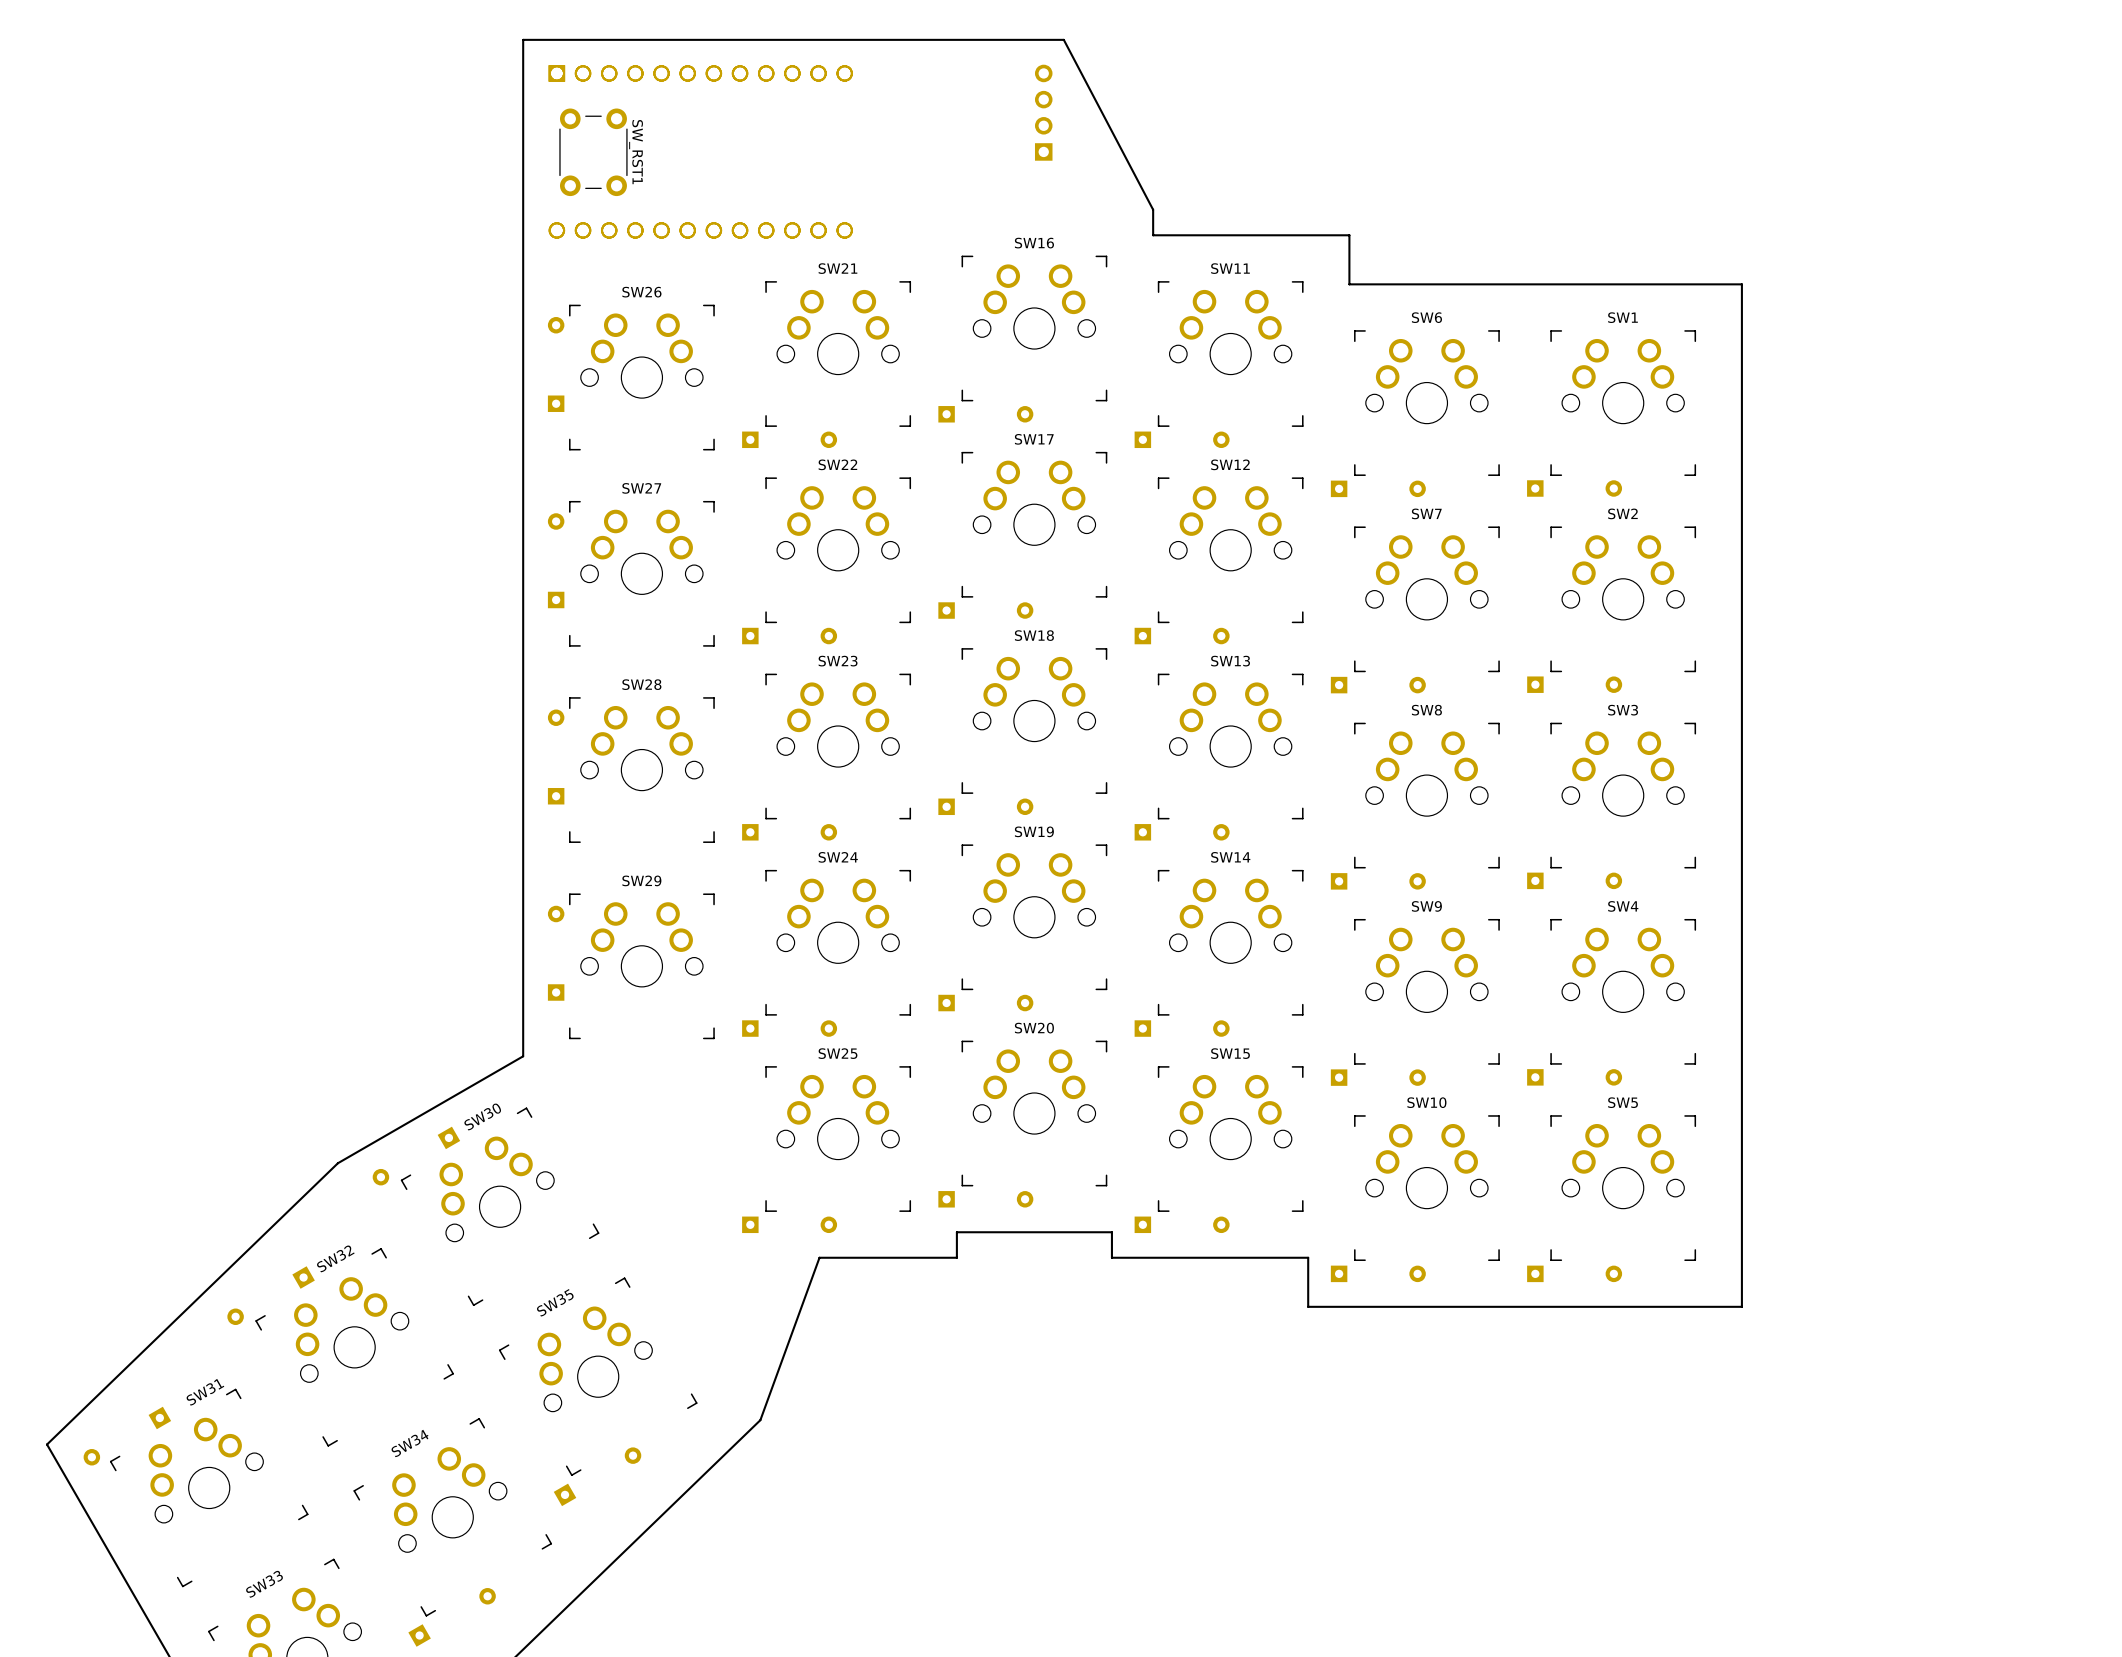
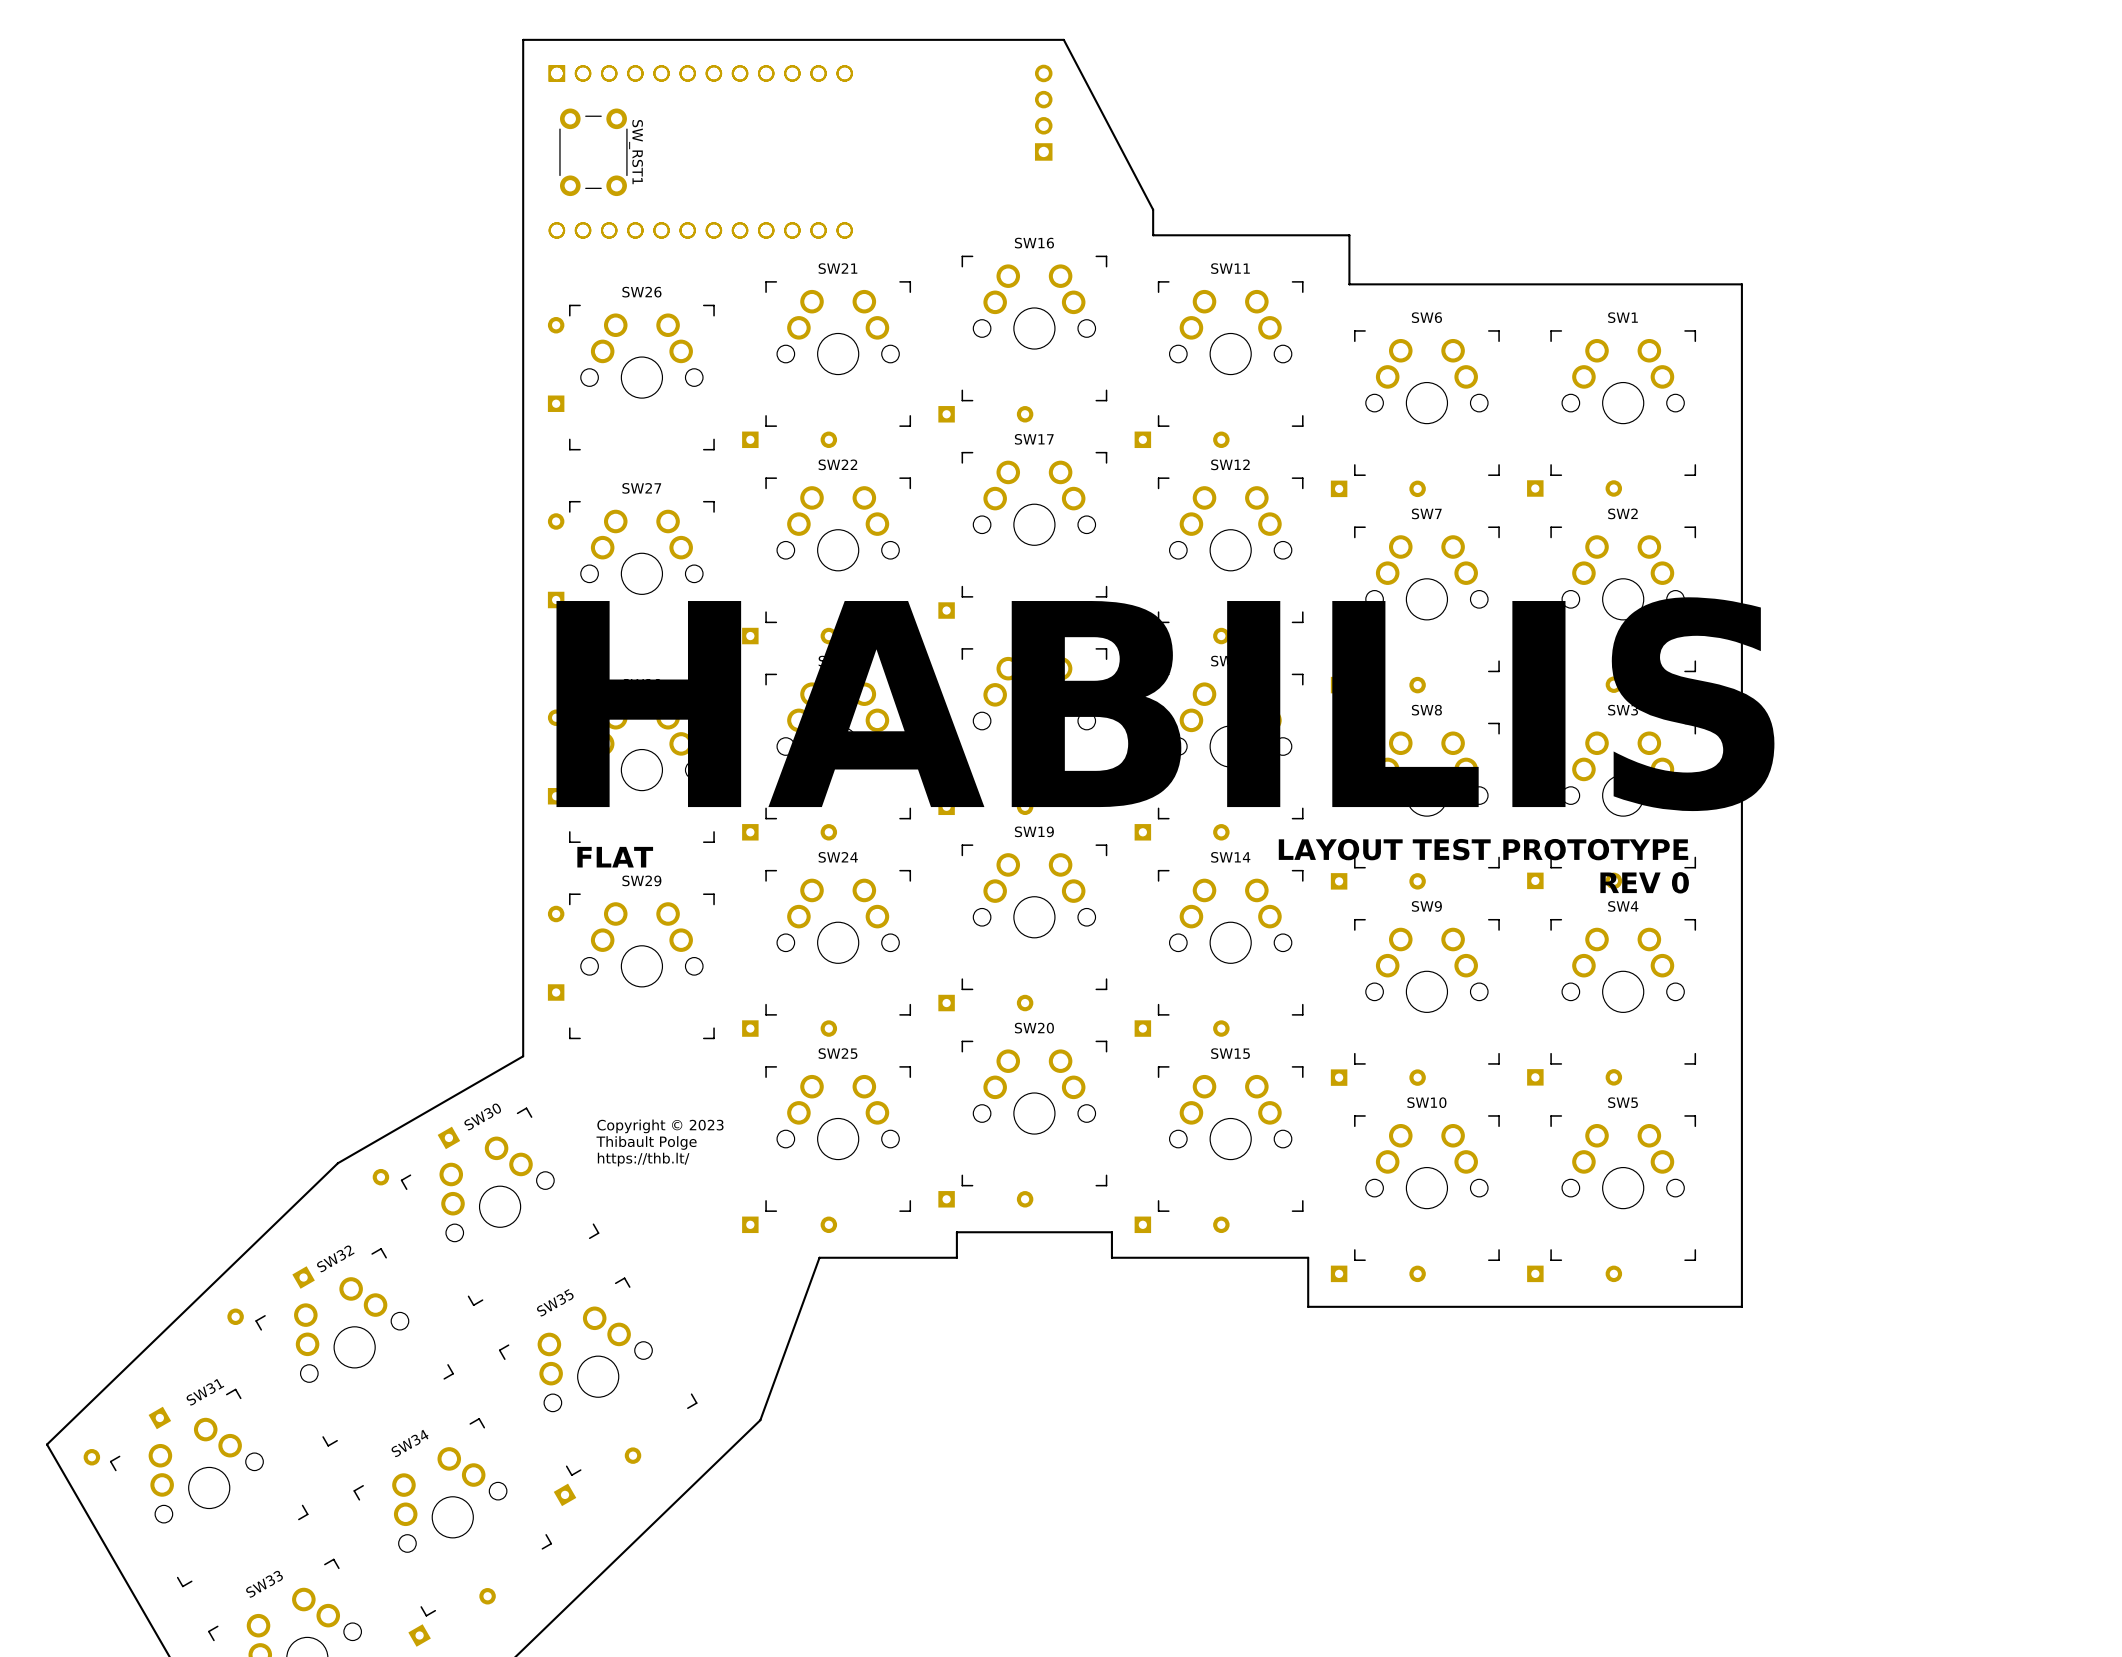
text: none -> HABILIS (1165, 704)
text: none -> LAYOUT TEST PROTOTYPE (1483, 849)
text: none -> FLAT (615, 857)
text: none -> REV 0 (1644, 882)
text: none -> Copyright © 2023 (660, 1126)
text: none -> Thibault Polge (646, 1142)
text: none -> https://thb.lt/ (643, 1159)

